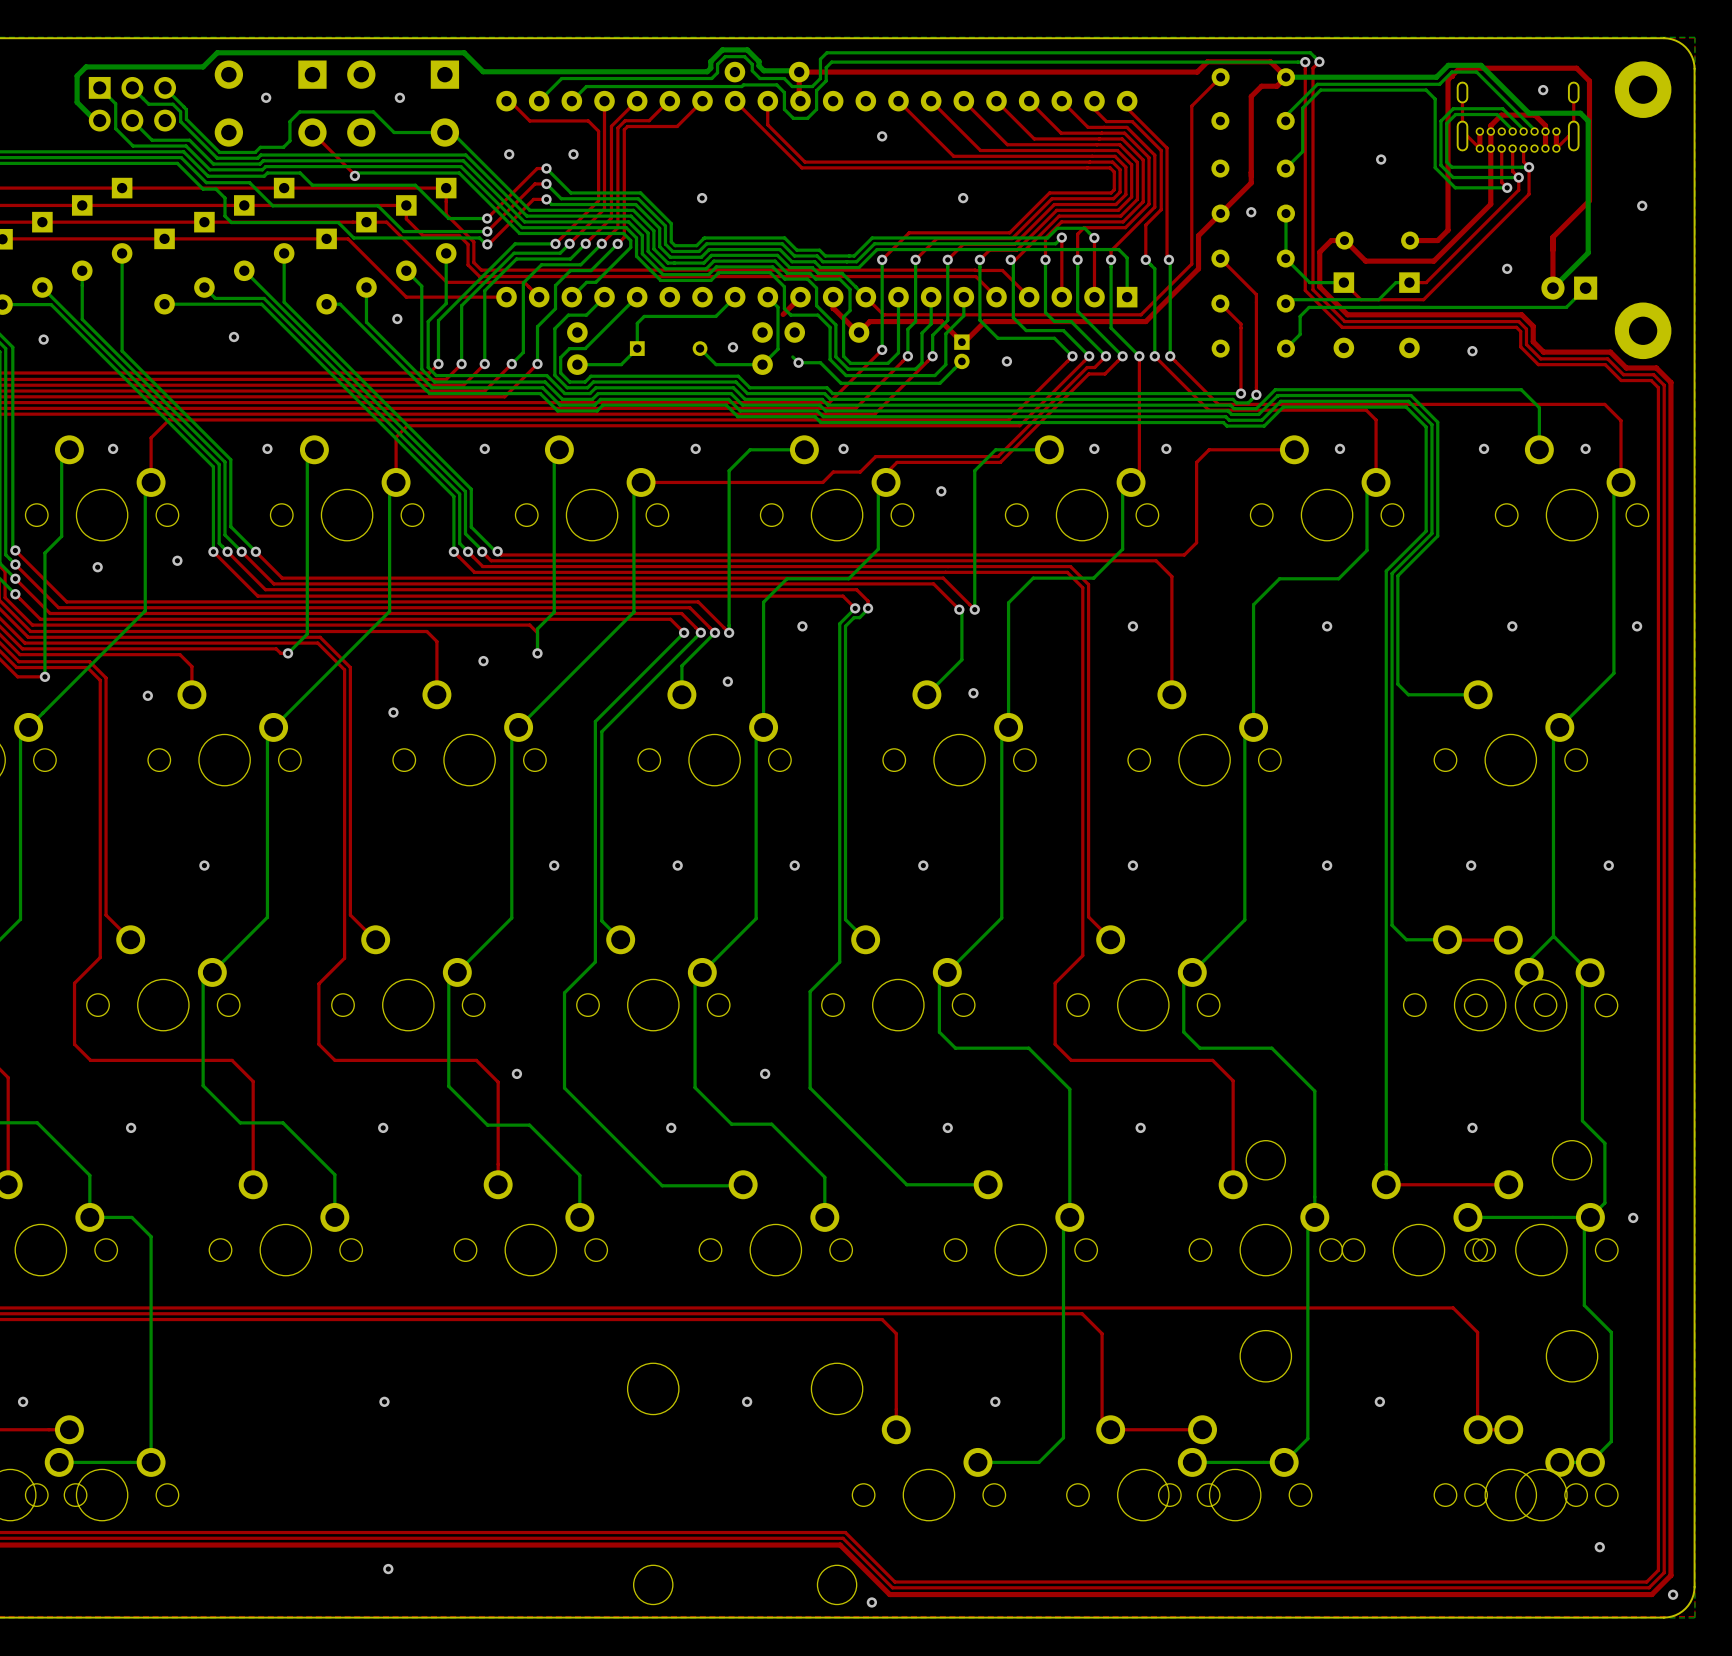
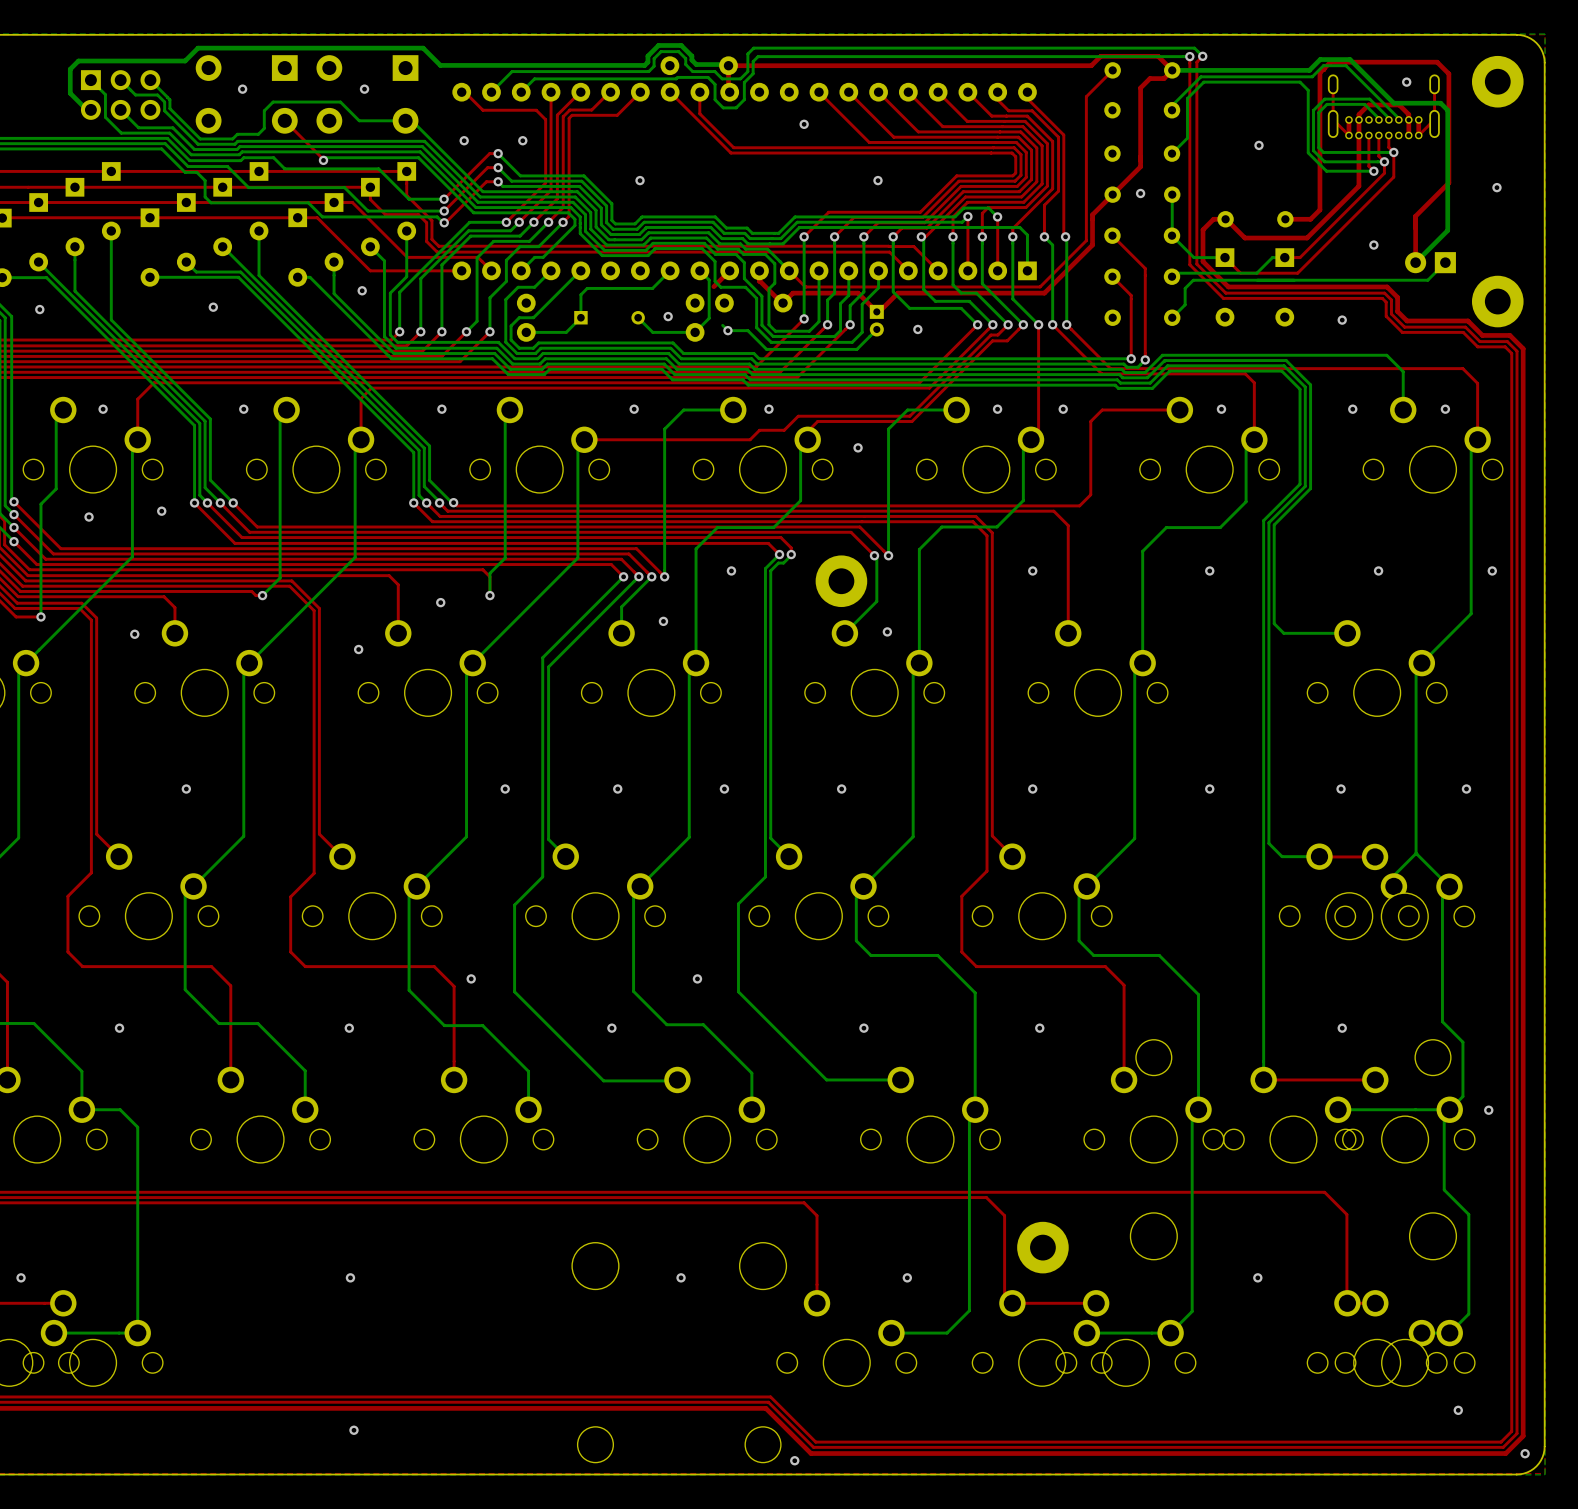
part: none -> (841, 581)
part: none -> (1042, 1247)

